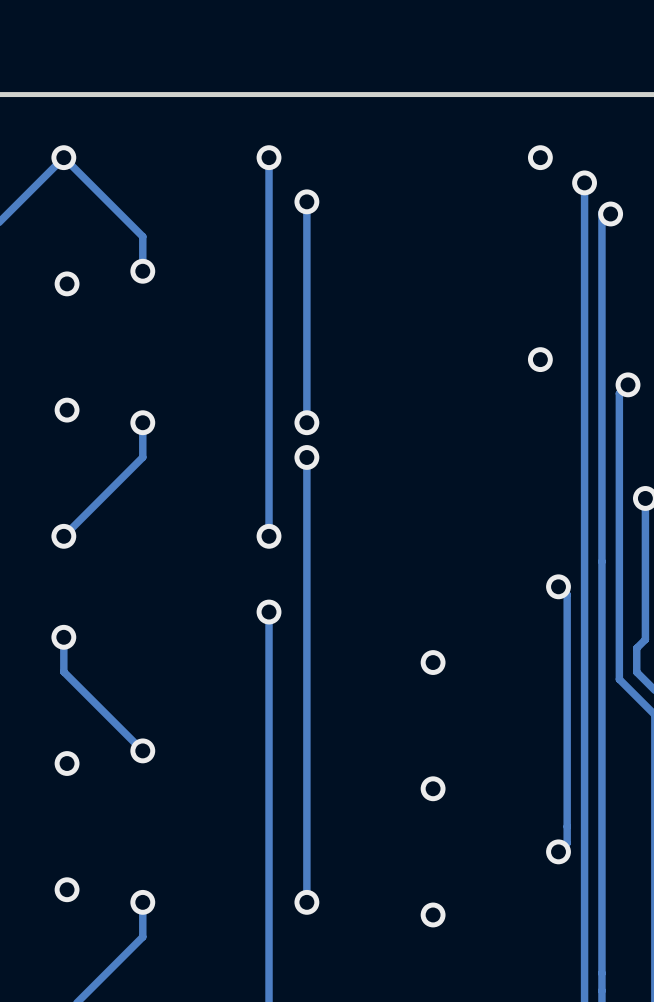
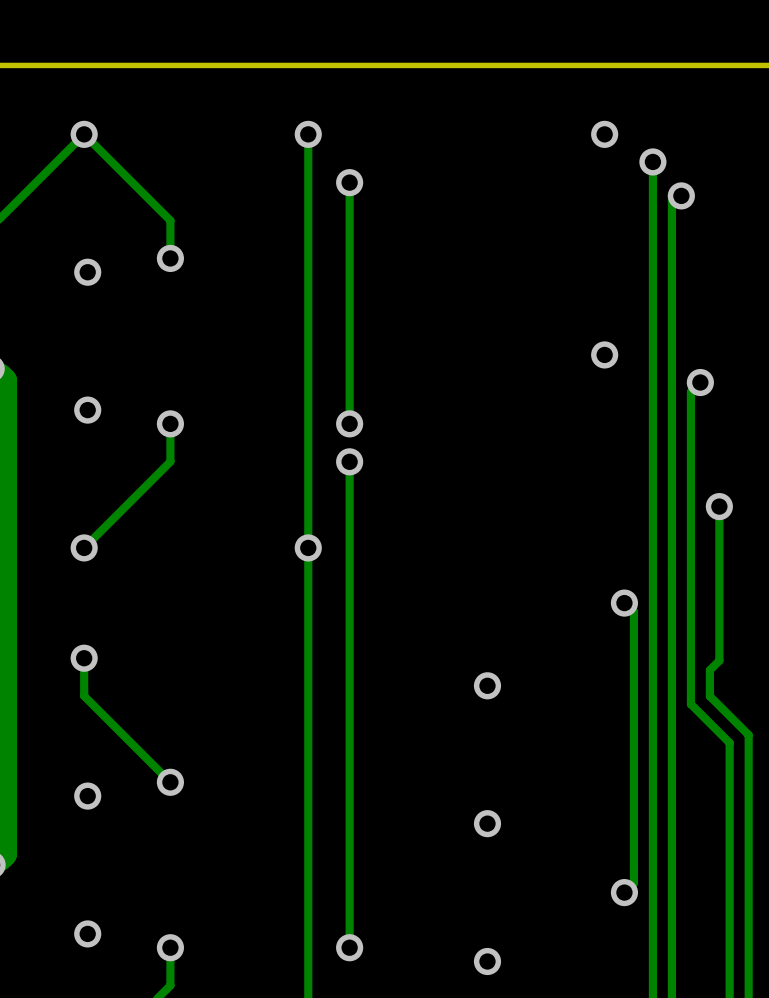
track: none -> (308, 547) (308, 630)
via: (269, 612) -> none

